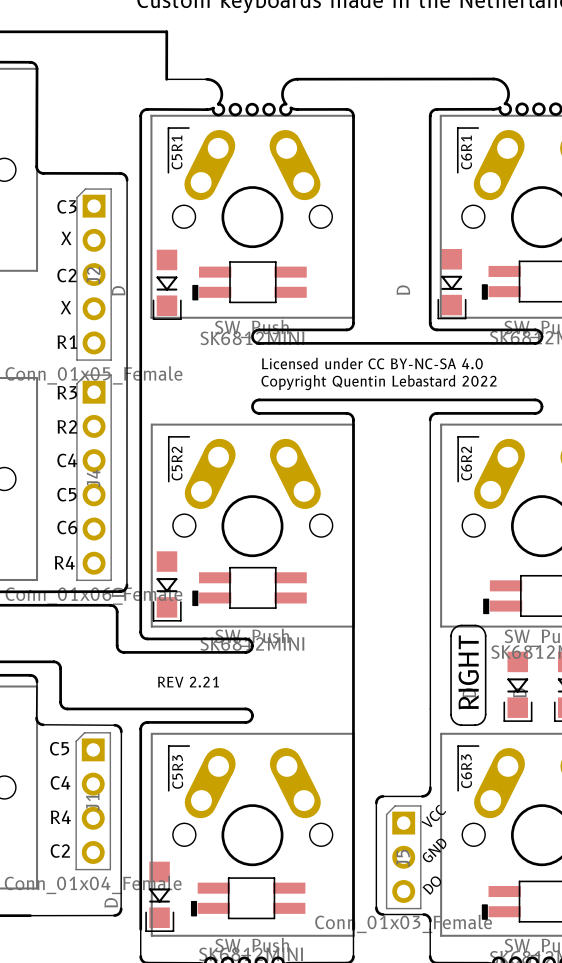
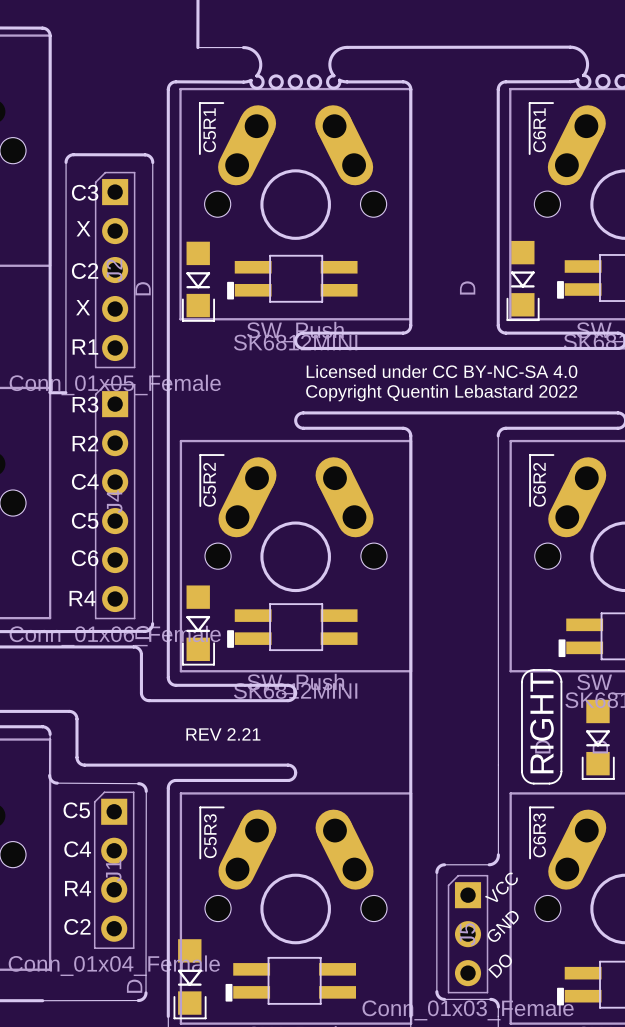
board edge: (37, 69) (38, 170) (43, 173) (120, 173) -> (50, 35) (50, 392) (65, 392) (66, 159) (73, 154) (145, 154)

